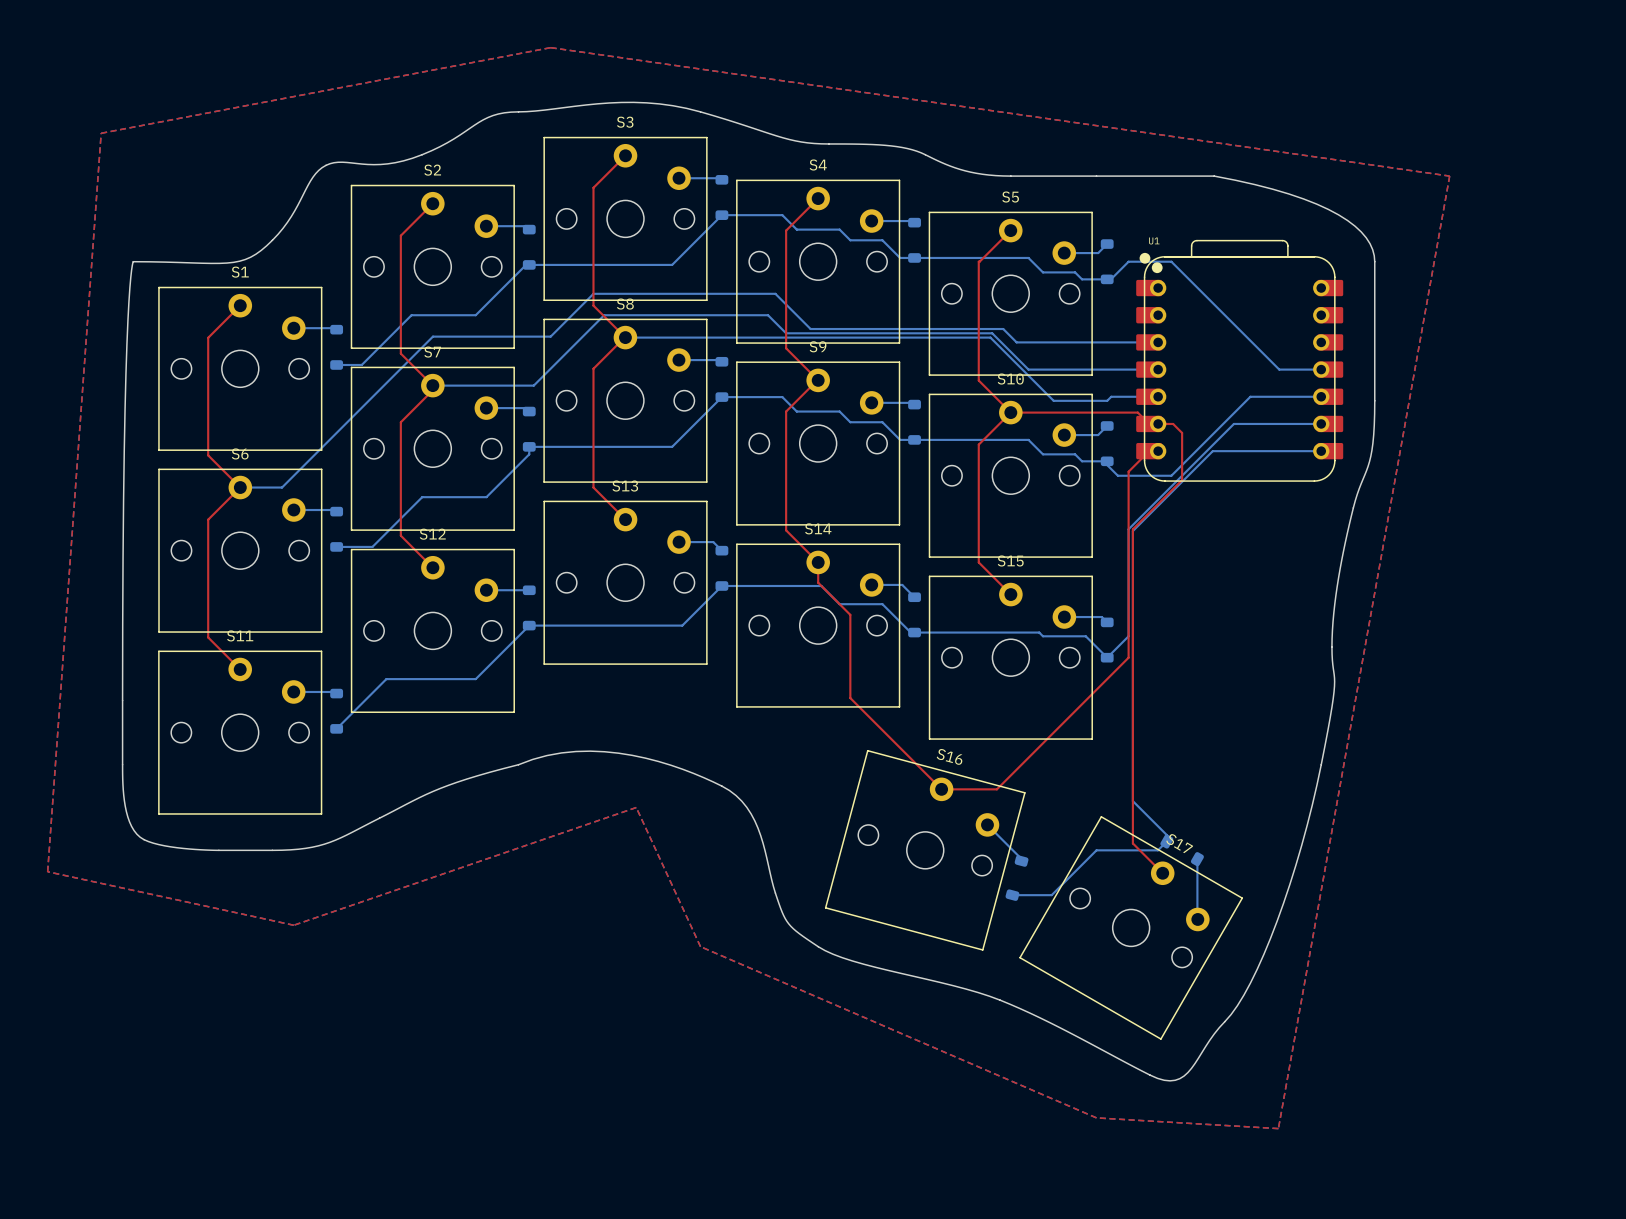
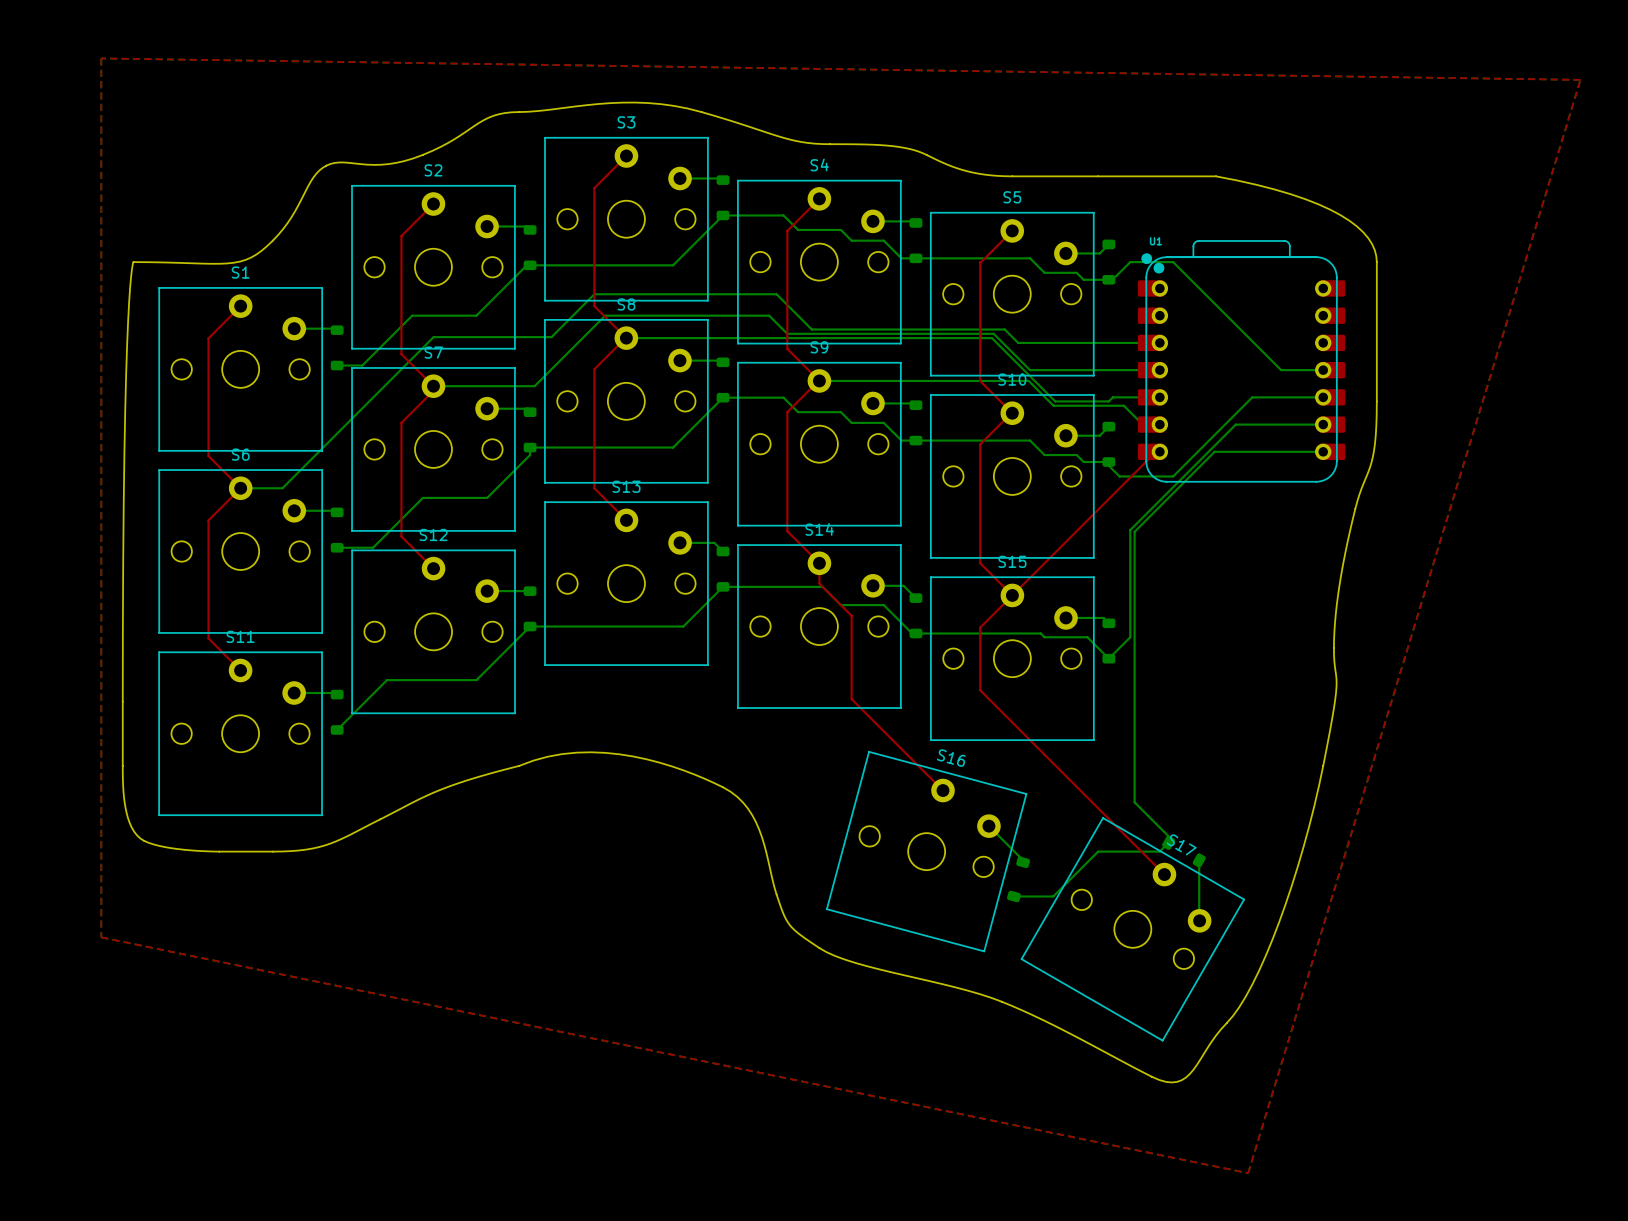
top zone outline: (550, 47) (101, 133) (47, 871) (293, 925) (636, 807) (700, 946) (1096, 1117) (1278, 1128) (1449, 176) (550, 47) -> (101, 58) (101, 937) (1248, 1173) (1580, 79) (101, 58)
bottom track: none -> (819, 380) (1028, 380) (1053, 405) (1123, 405) (1142, 424) (1159, 424)
top track: (1149, 423) (1137, 412) (1010, 412) (978, 444) -> (1012, 413) (980, 445)
top track: (1158, 423) (1173, 423) (1182, 432) (1182, 480) (1132, 529) (1132, 843) -> (1159, 451) (1156, 451) (980, 627) (980, 690) (1134, 844)
top track: (1149, 451) (1128, 471) (1128, 657) (996, 789) (941, 789) -> none

